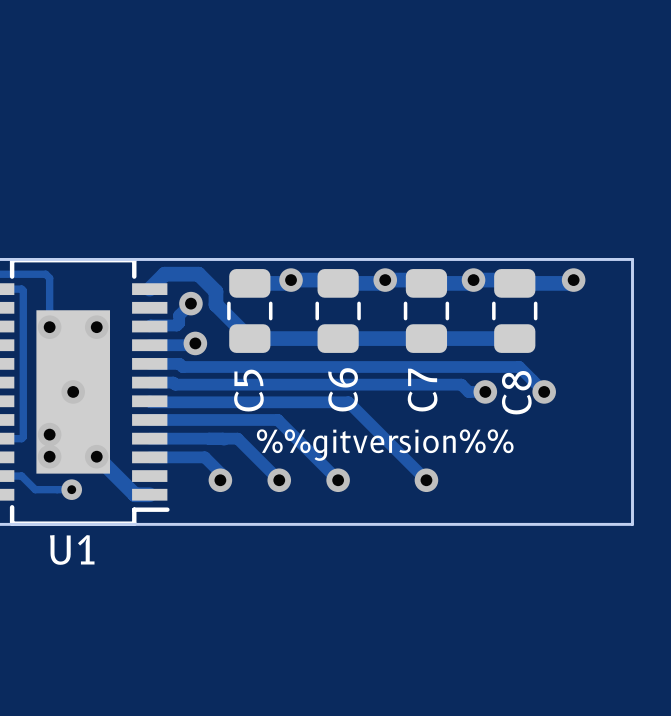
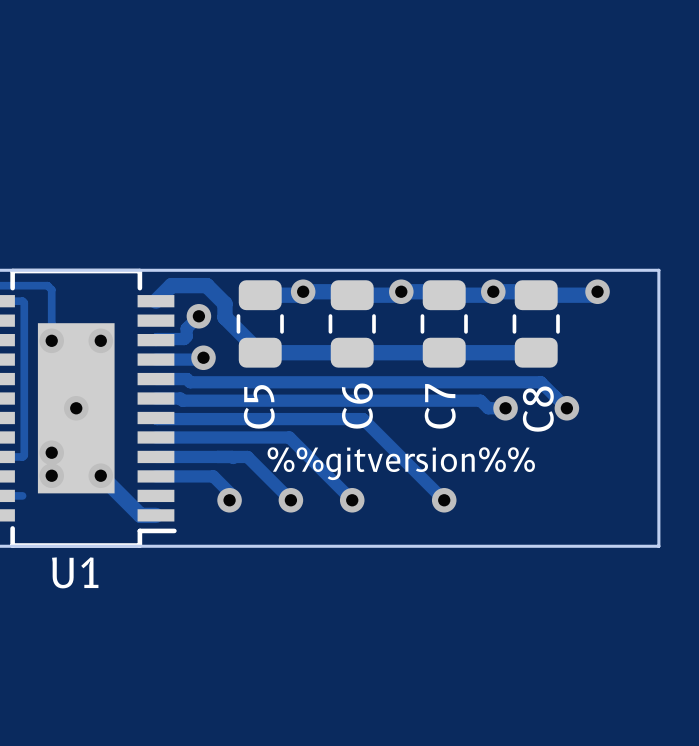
track: (21, 476) (35, 489) (71, 489) -> none
via: (71, 489) -> none

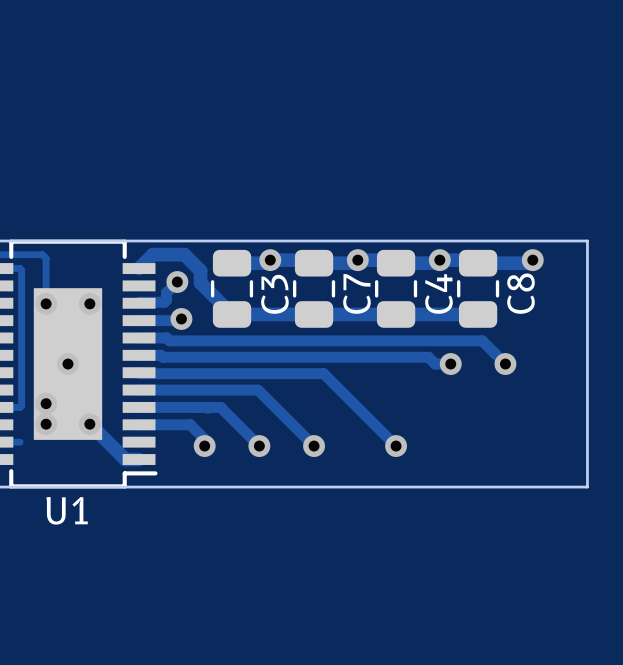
C5 name: C5 (259, 406) -> C3 (274, 294)
C6 name: C6 (357, 406) -> C7 (356, 293)
C7 name: C7 (440, 406) -> C4 (438, 293)
C8 name position: C8 (538, 409) -> C8 (521, 293)
text: %%gitversion%% (401, 463) -> none

